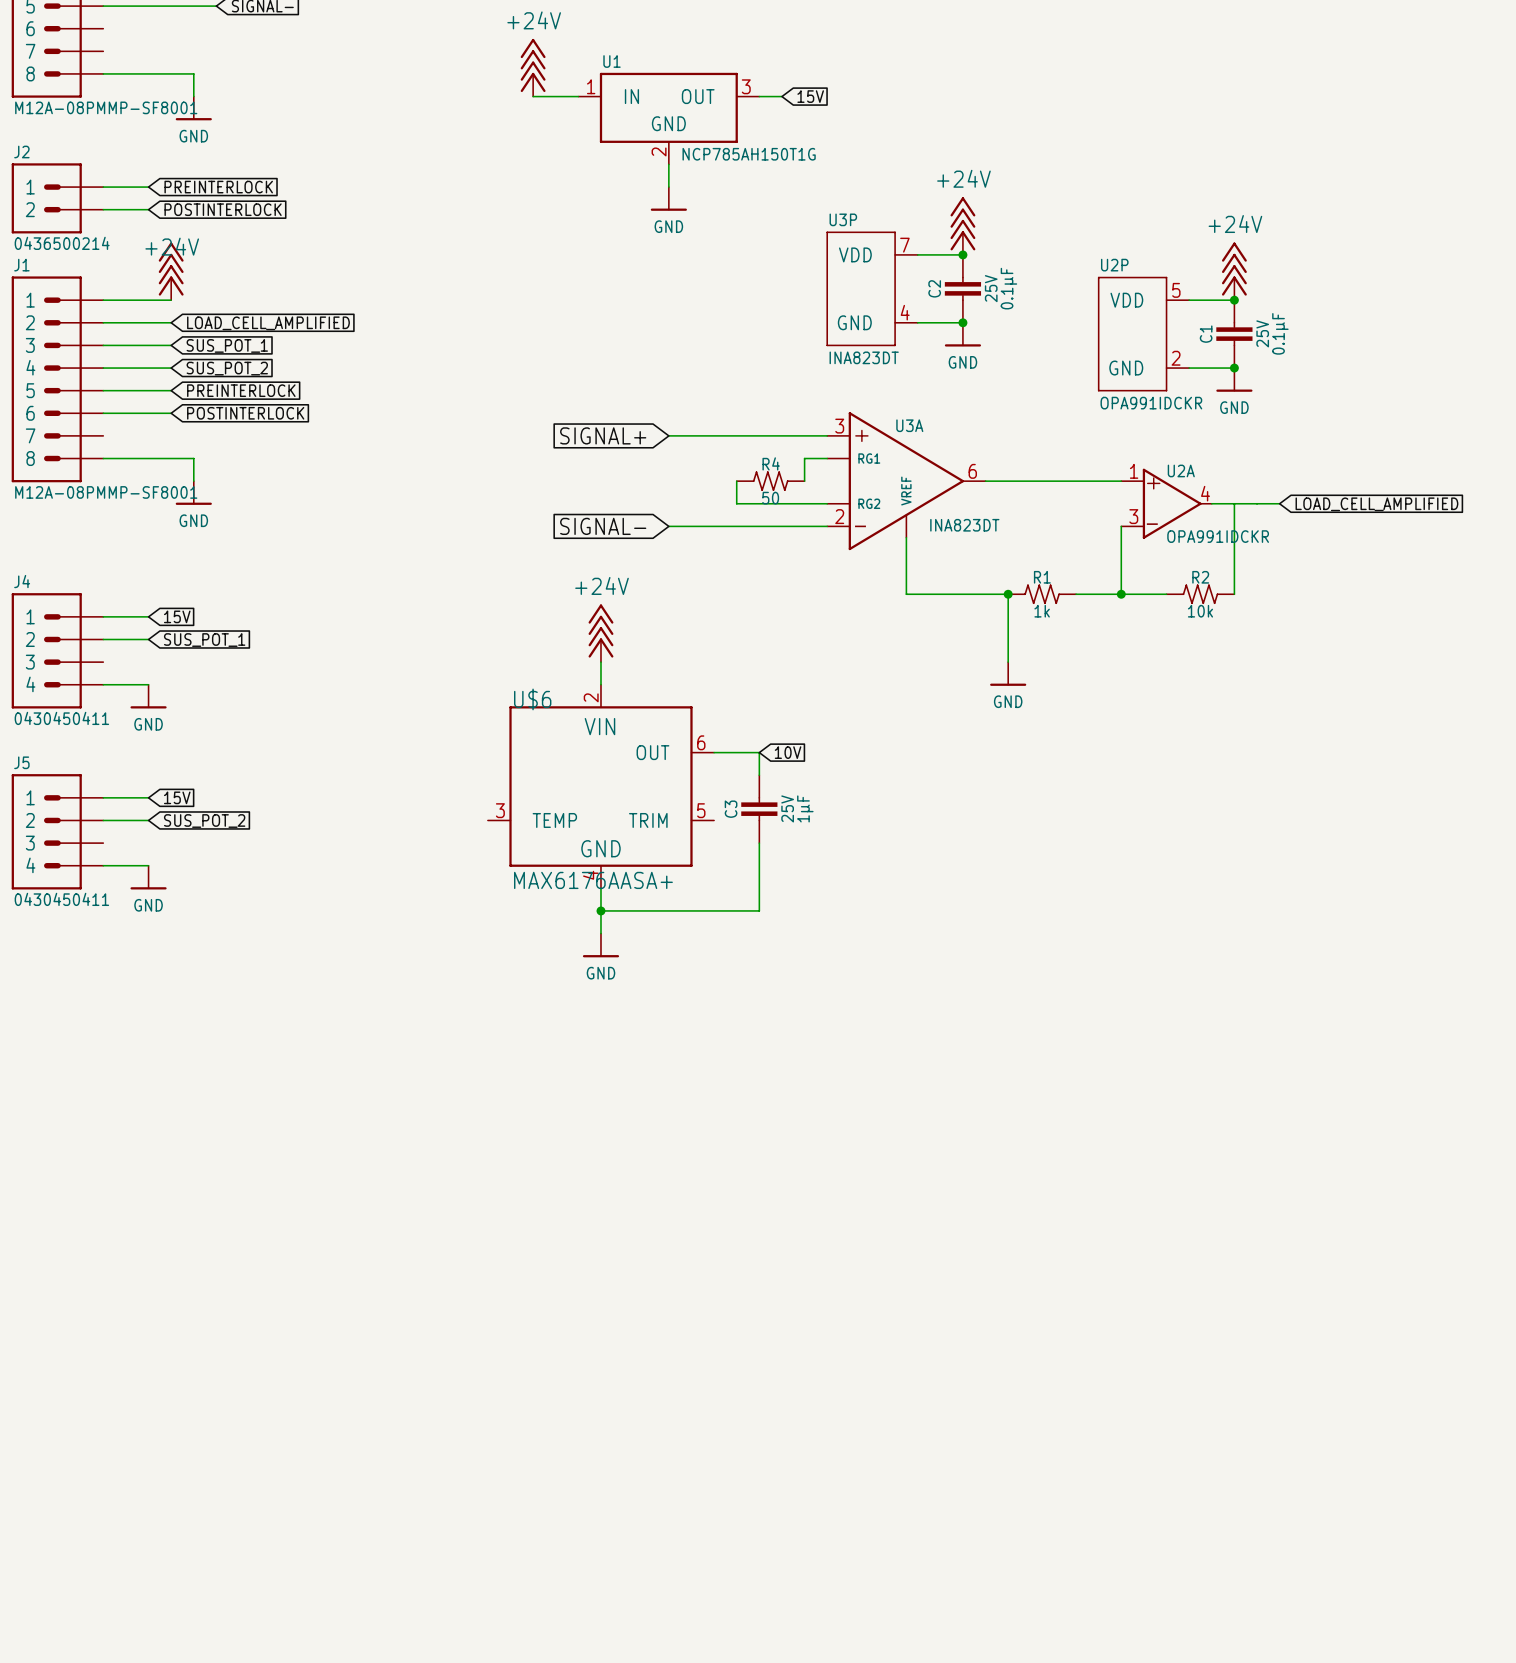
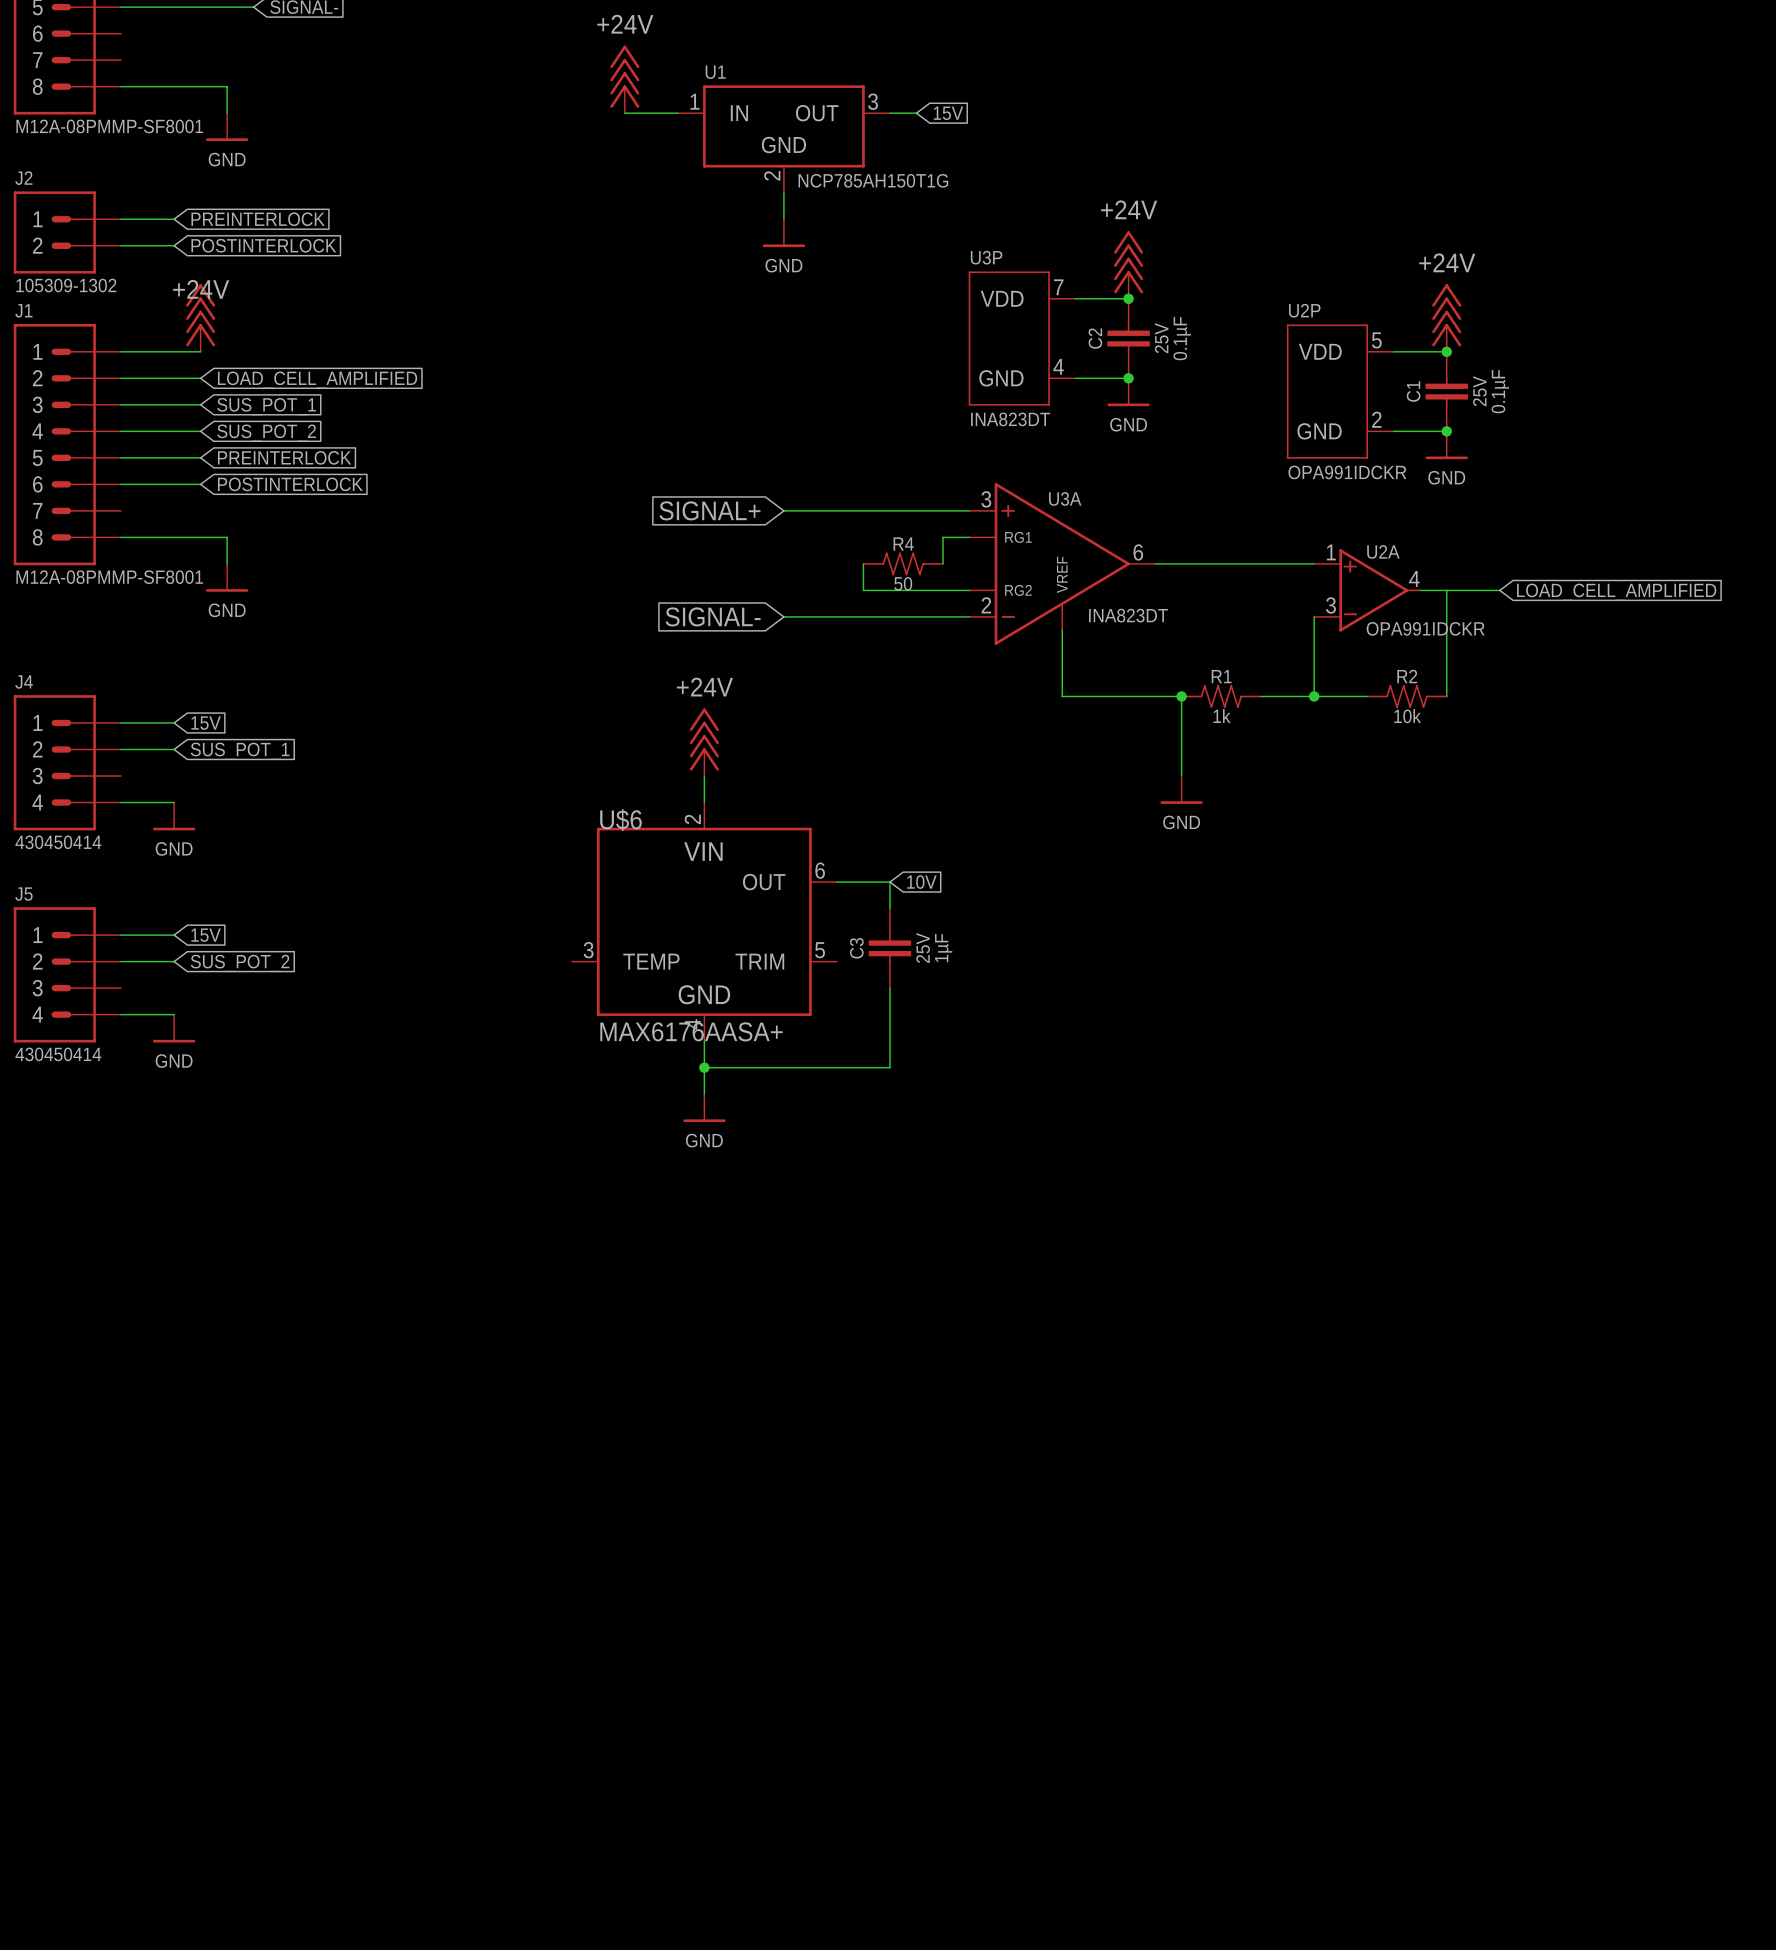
J2 text: 0436500214 (62, 243) -> 105309-1302 (66, 285)
J4 text: 0430450411 (61, 718) -> 430450414 (58, 842)
J5 text: 0430450411 (61, 899) -> 430450414 (58, 1054)

